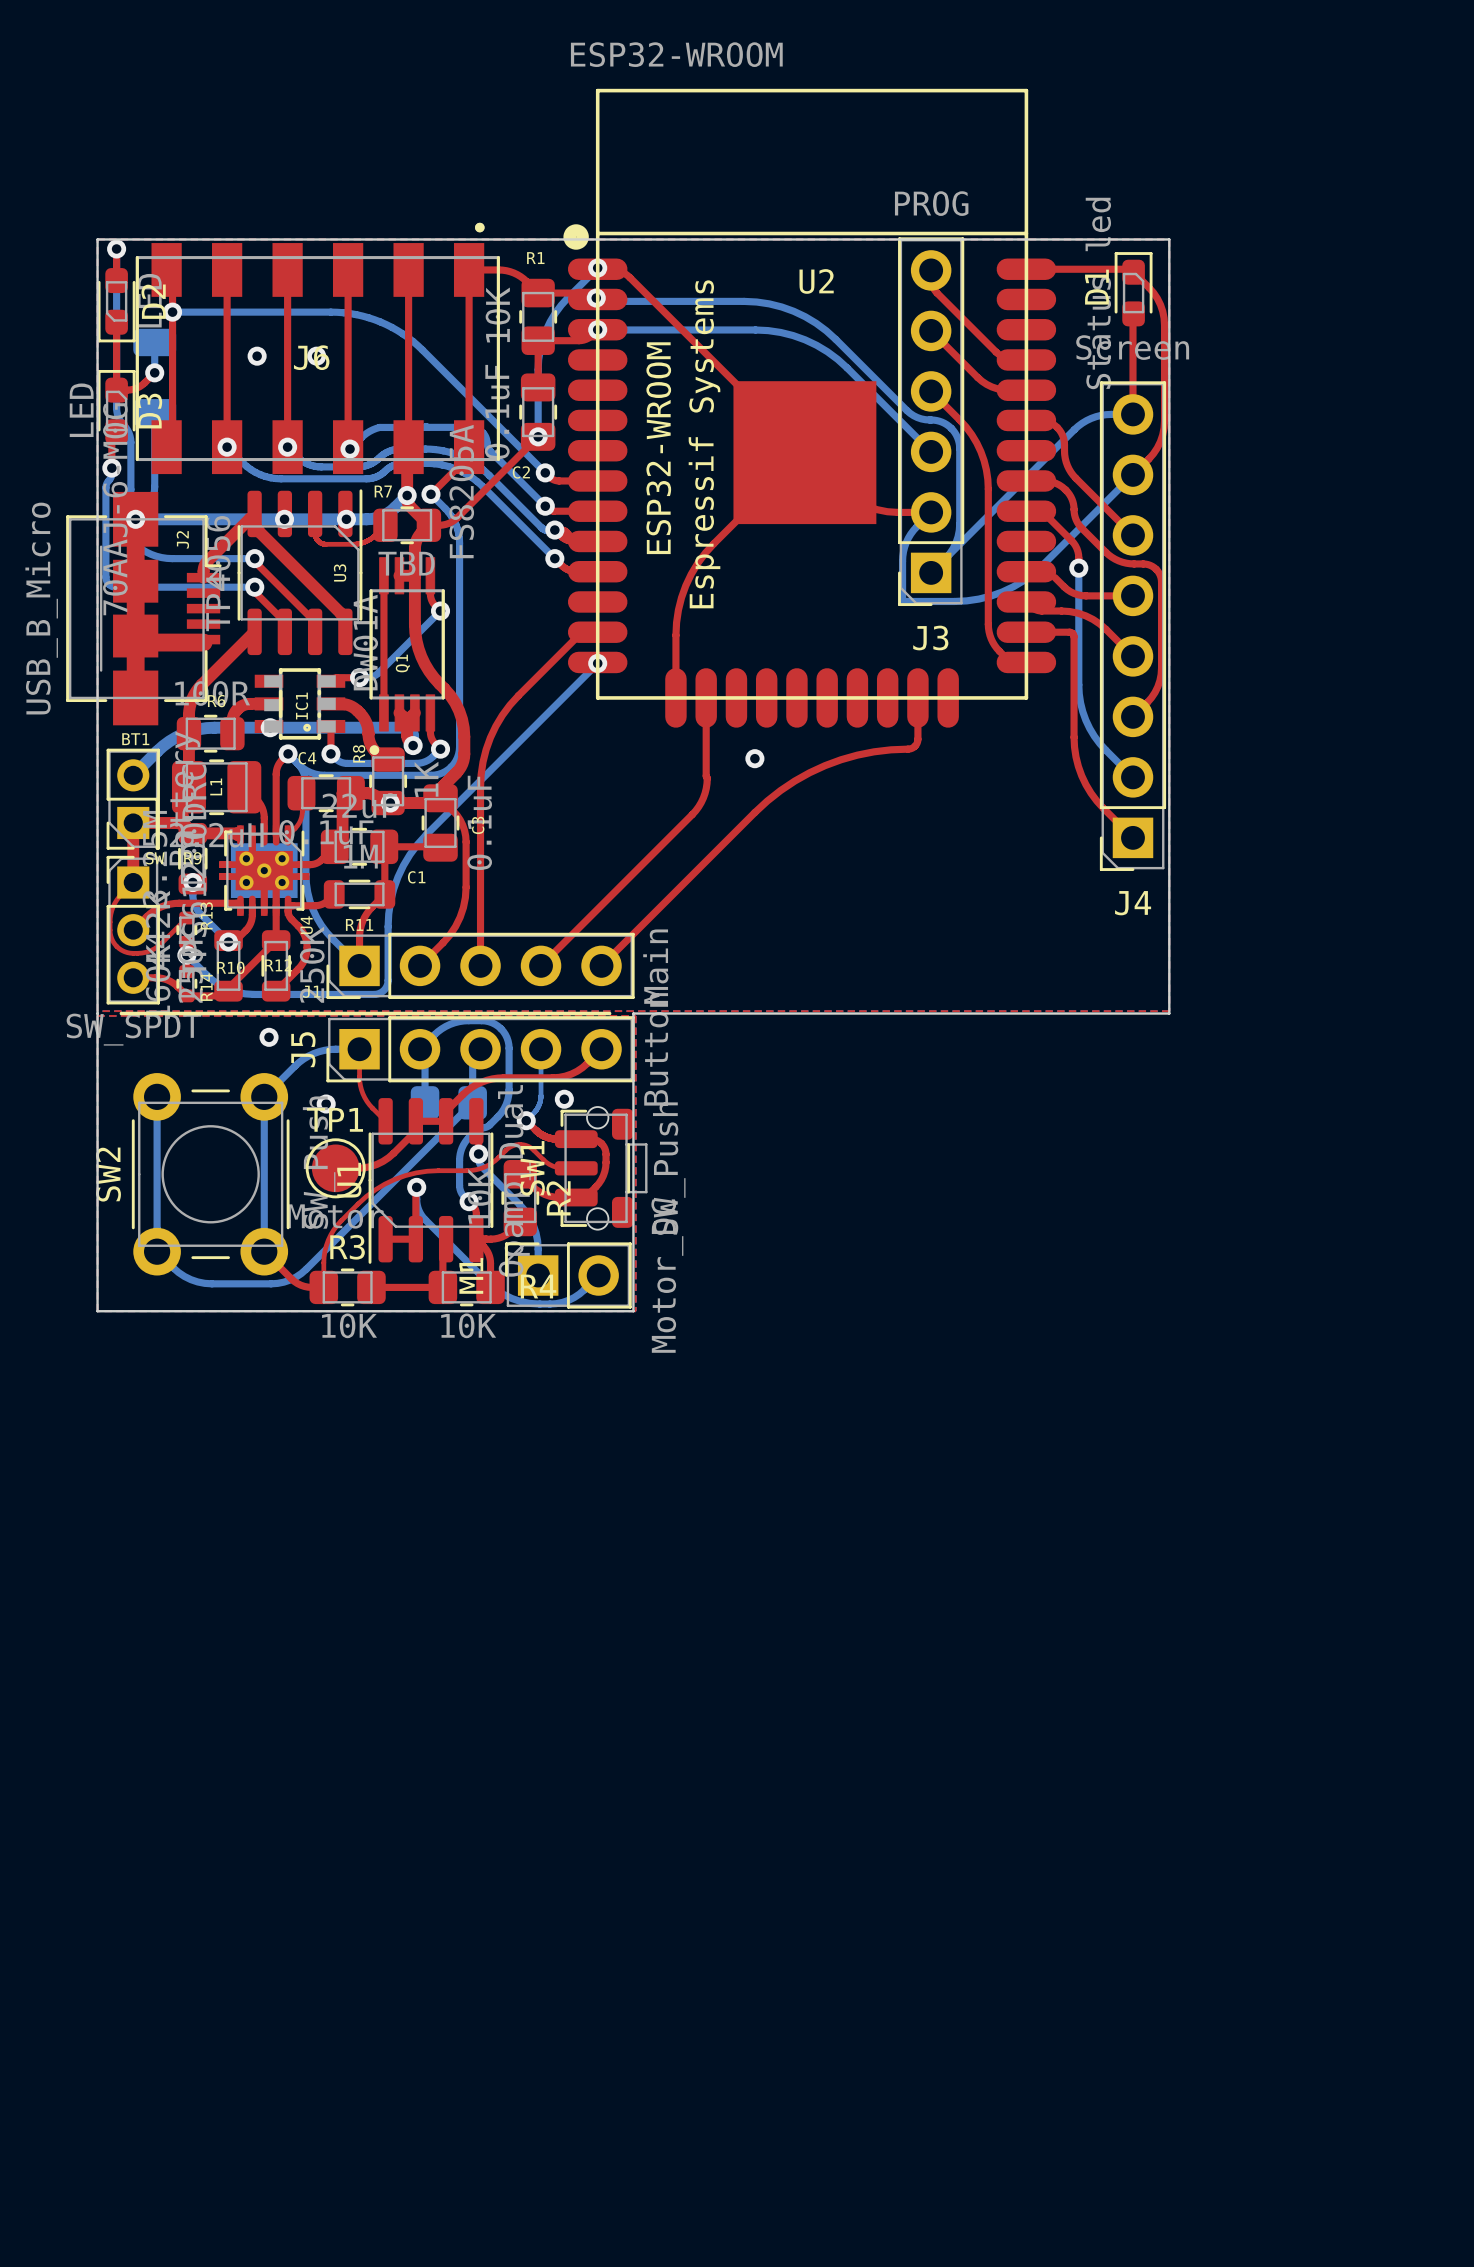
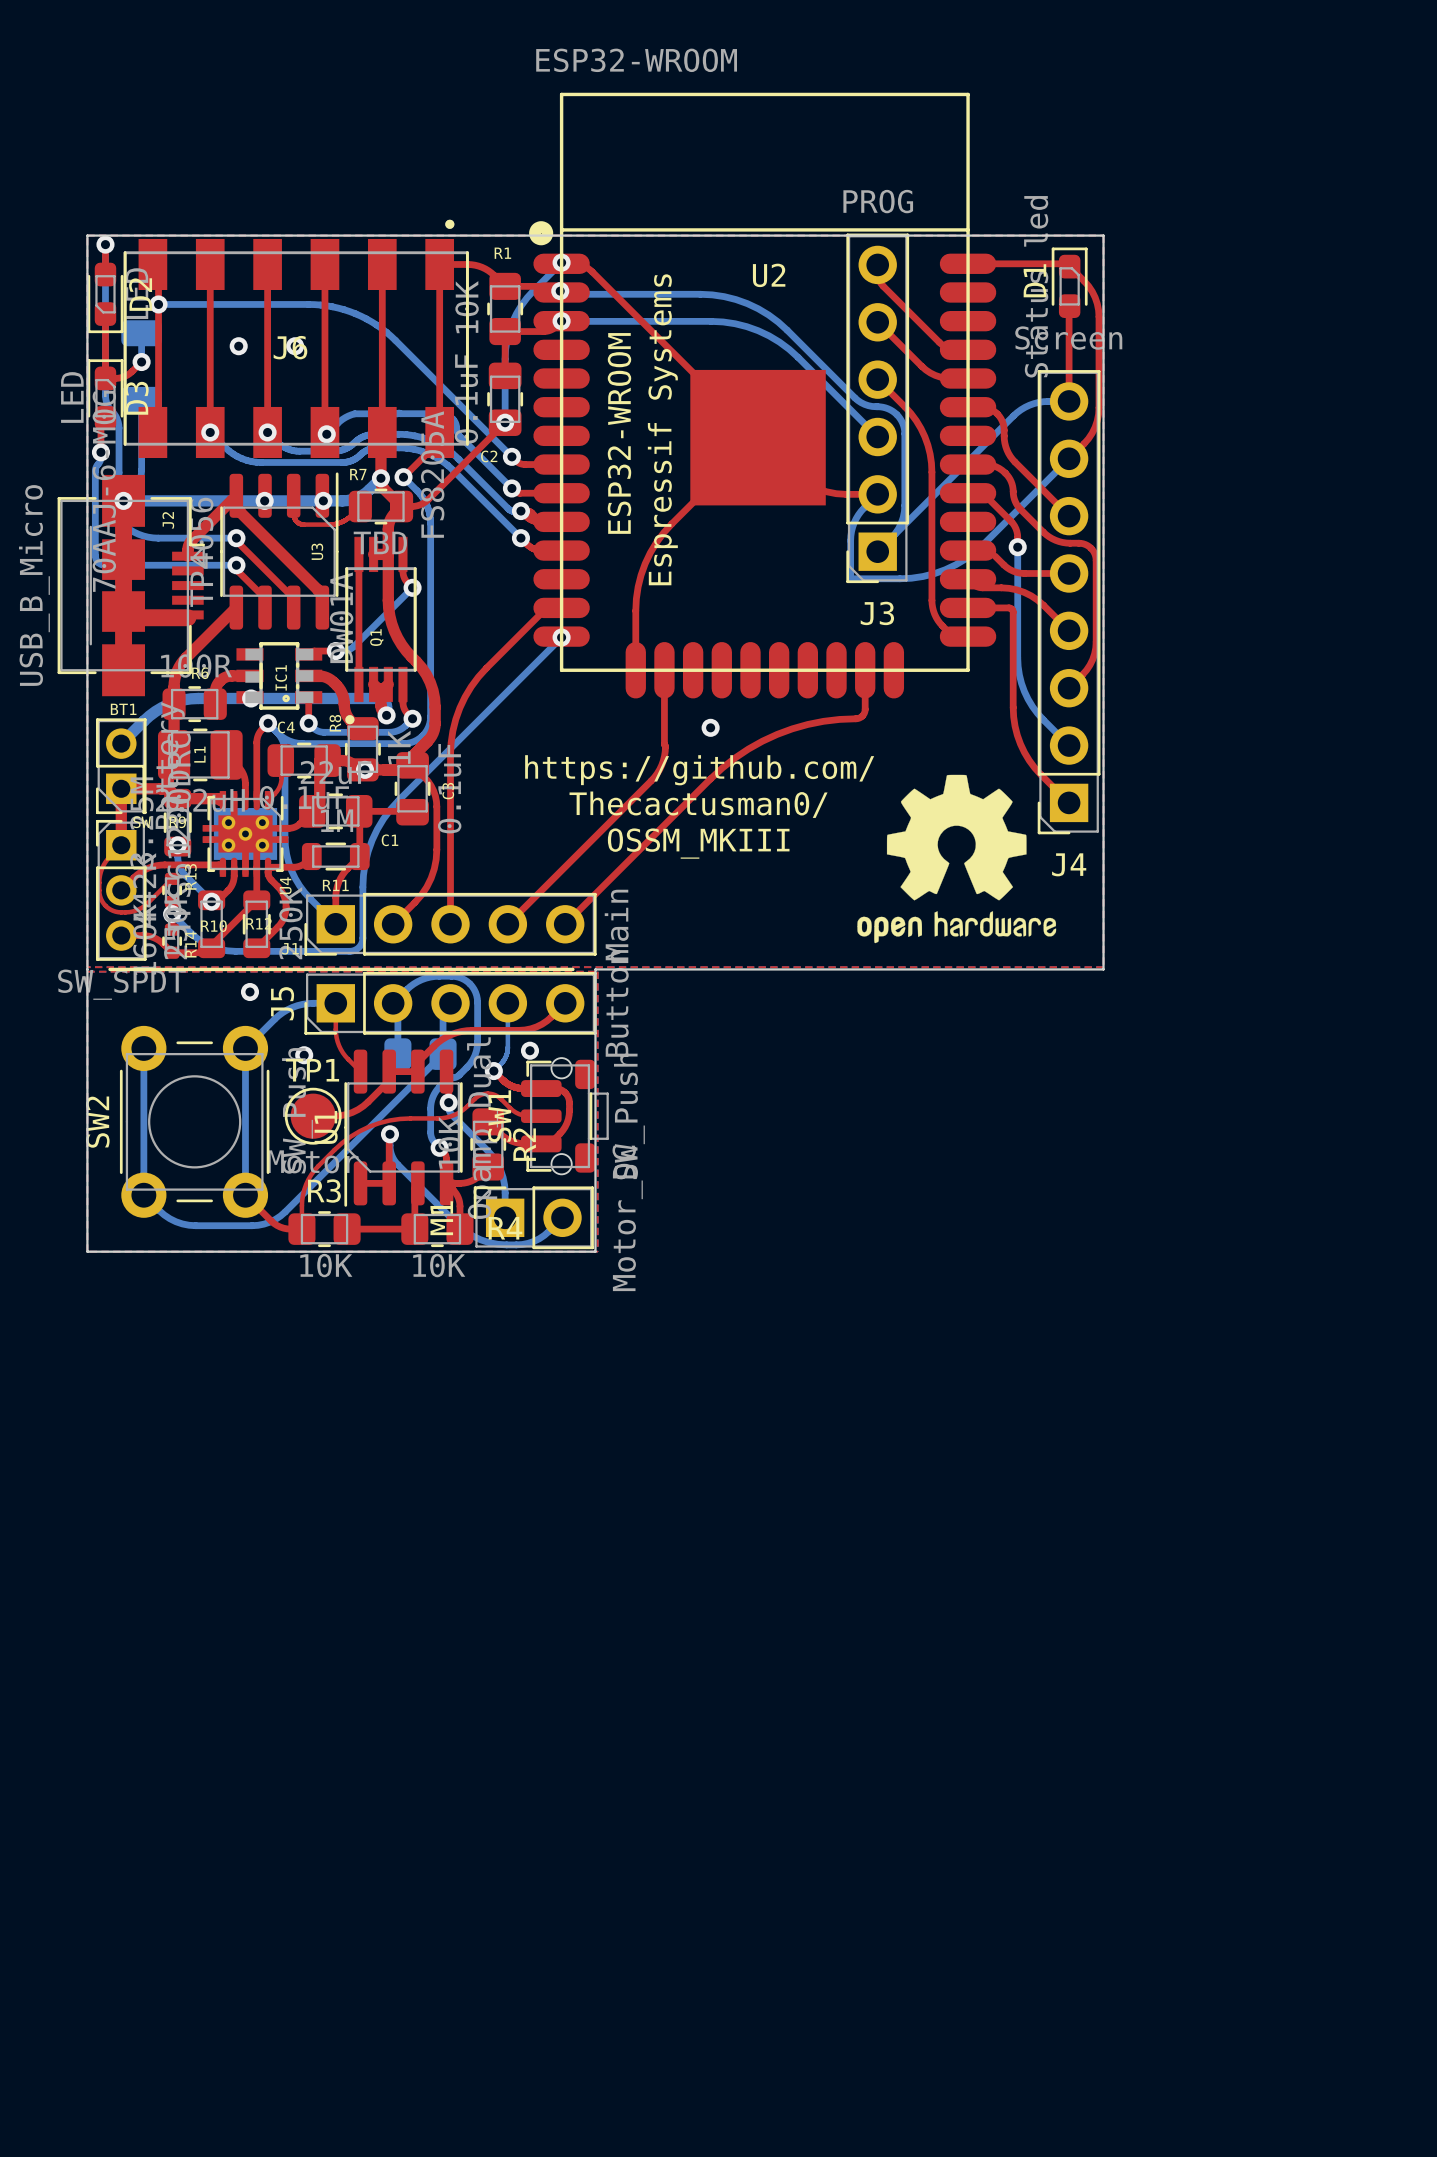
text: none -> https://github.com/ (699, 770)
drawing: none -> [857, 774, 1057, 944]
text: none -> Thecactusman0/ (698, 804)
text: none -> OSSM_MKIII (698, 843)

